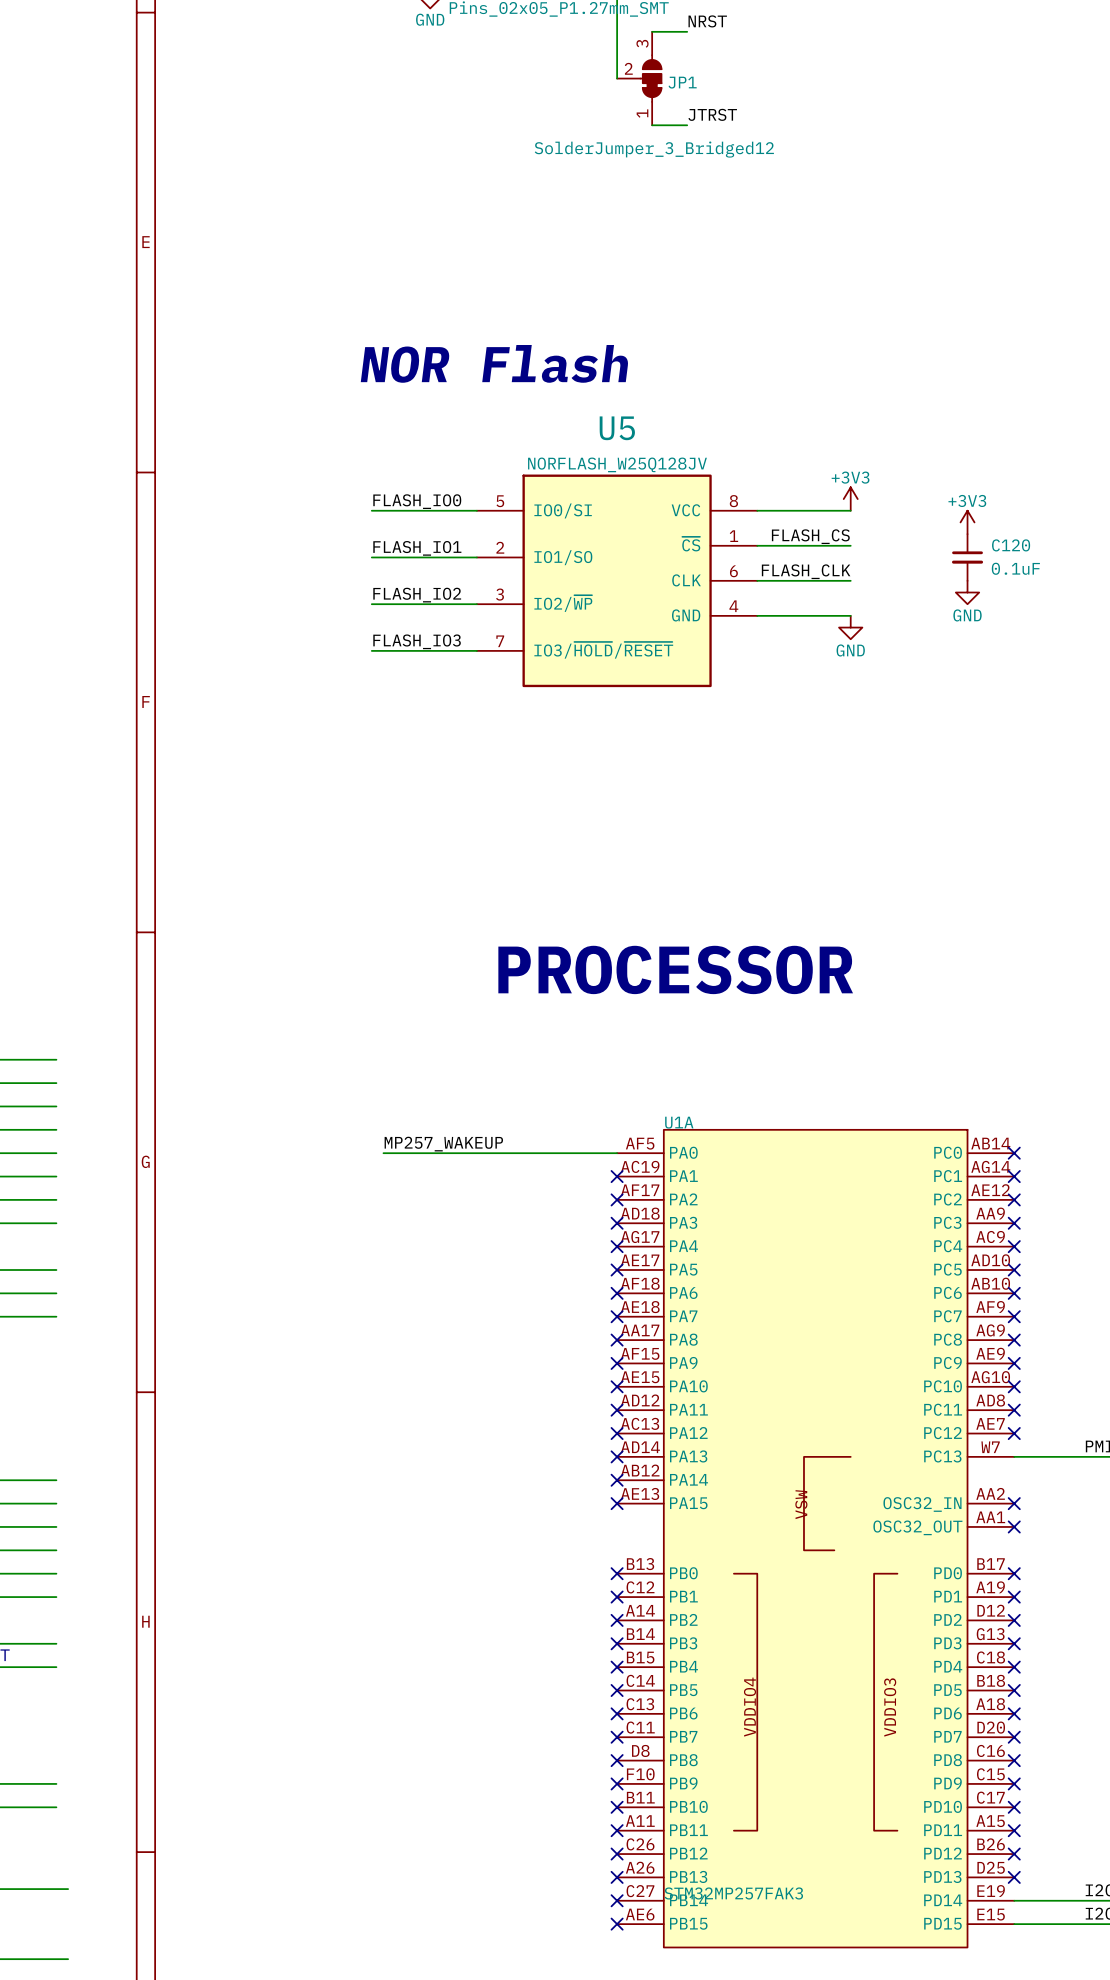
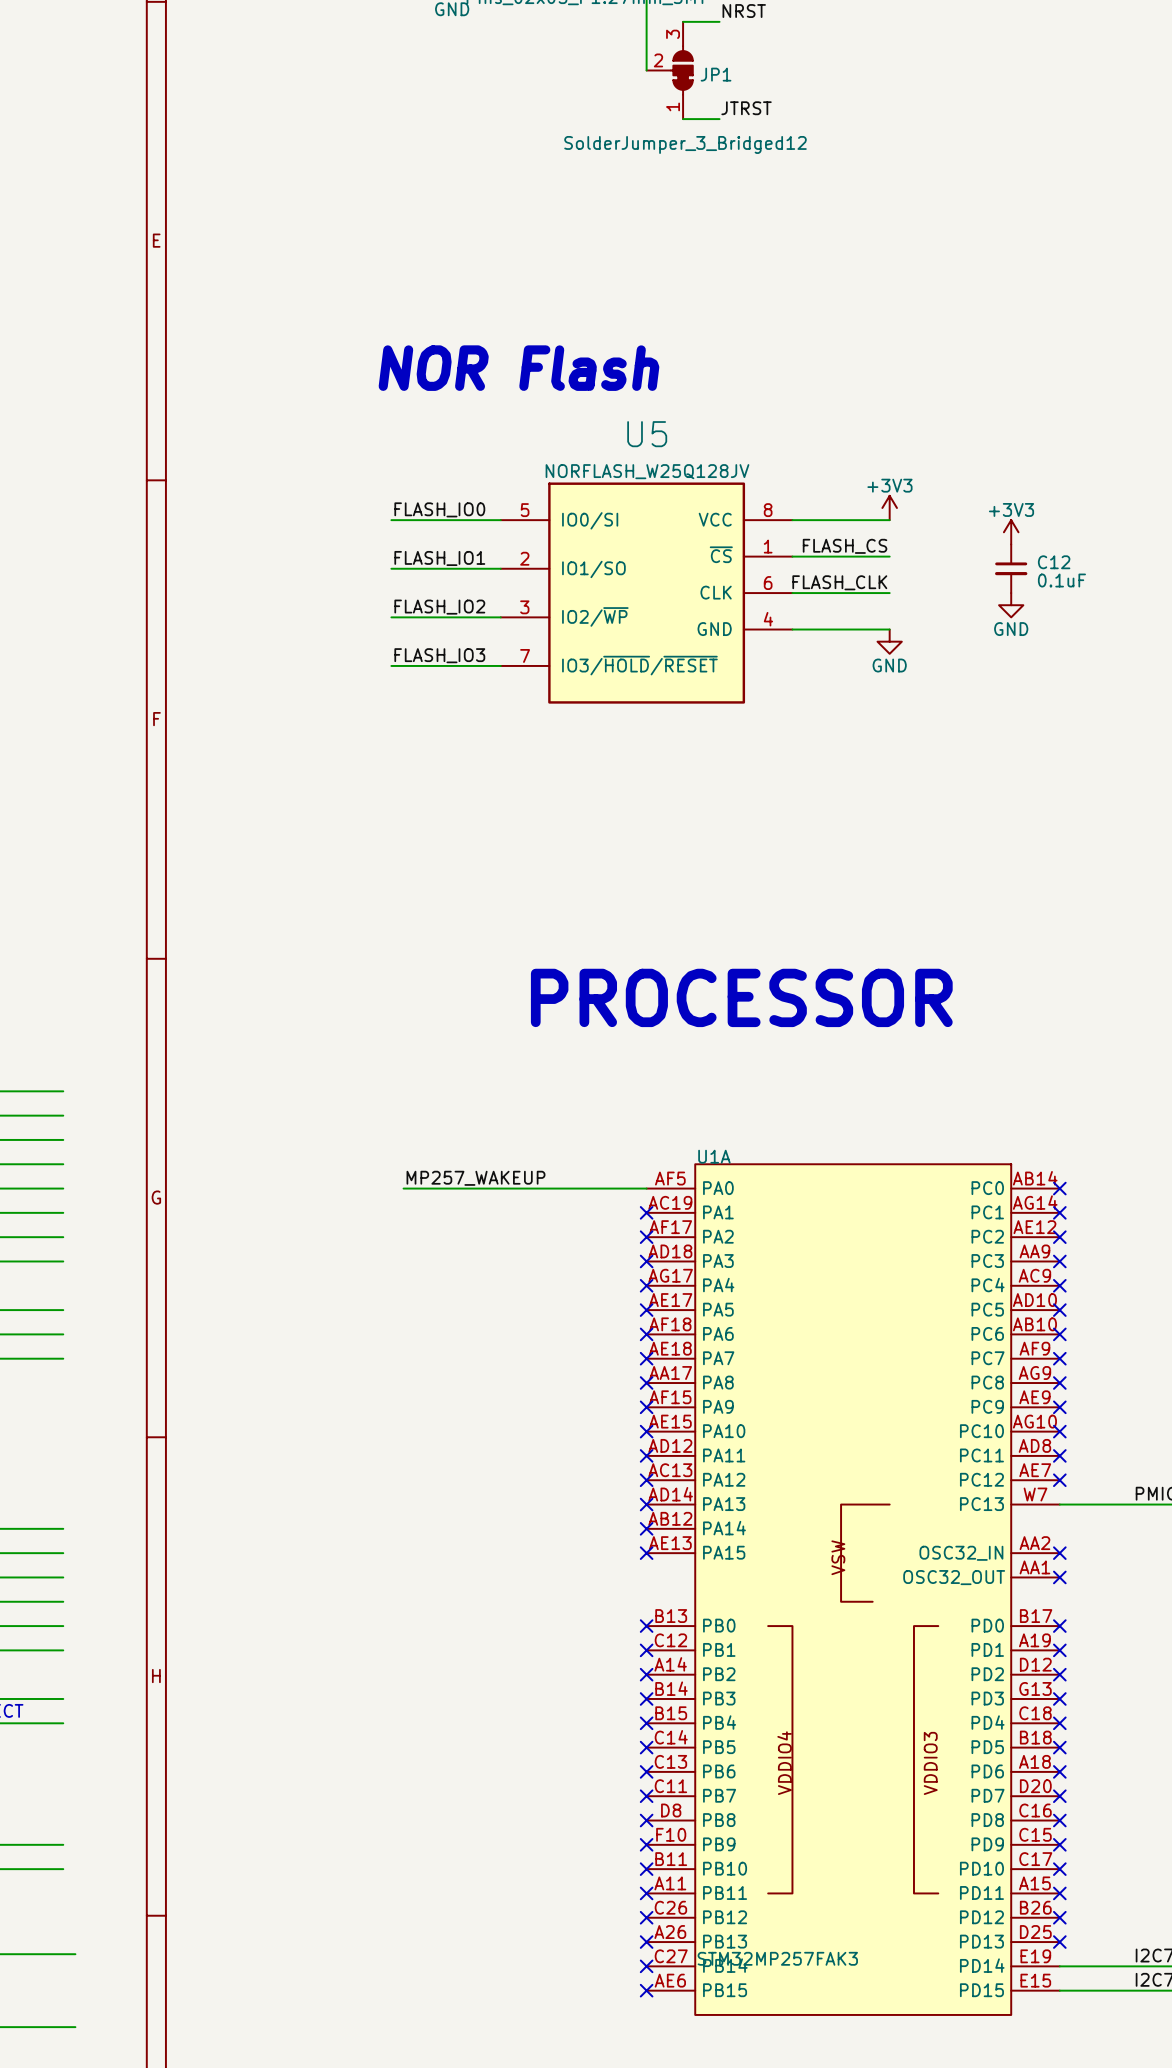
C120 name: C120 (1011, 545) -> C12 (1054, 562)

